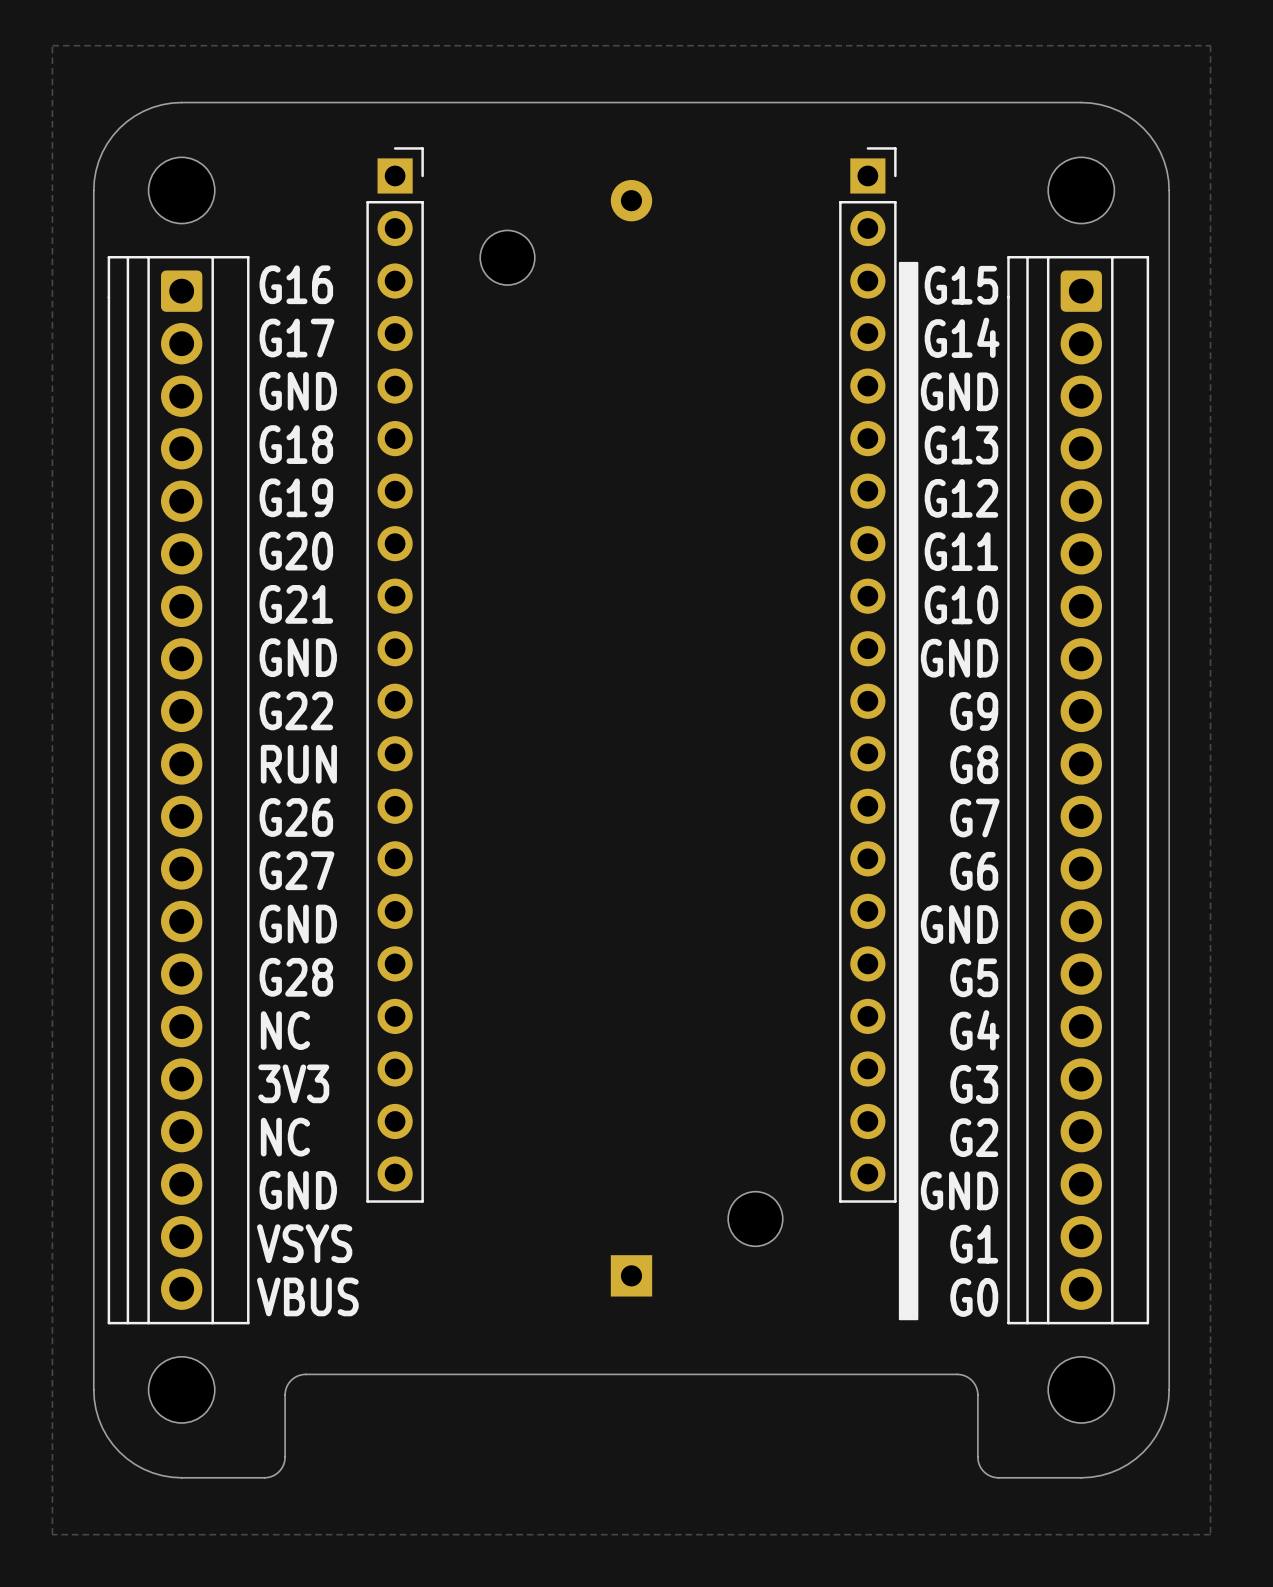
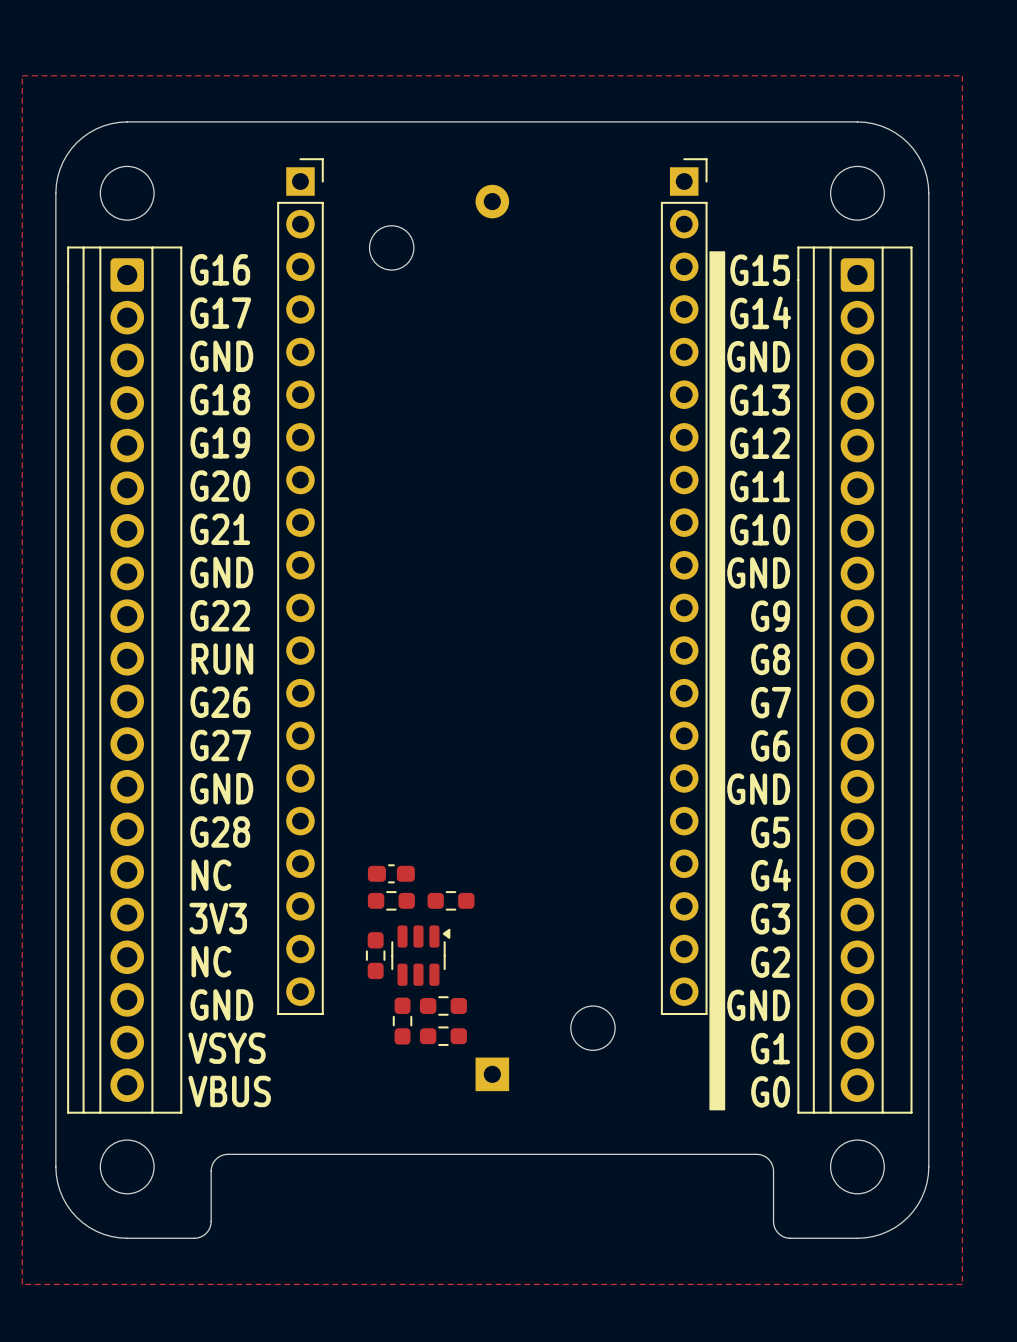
part: none -> (391, 873)
part: none -> (391, 900)
part: none -> (451, 900)
part: none -> (375, 955)
part: none -> (420, 955)
part: none -> (443, 1005)
part: none -> (402, 1021)
part: none -> (443, 1036)

